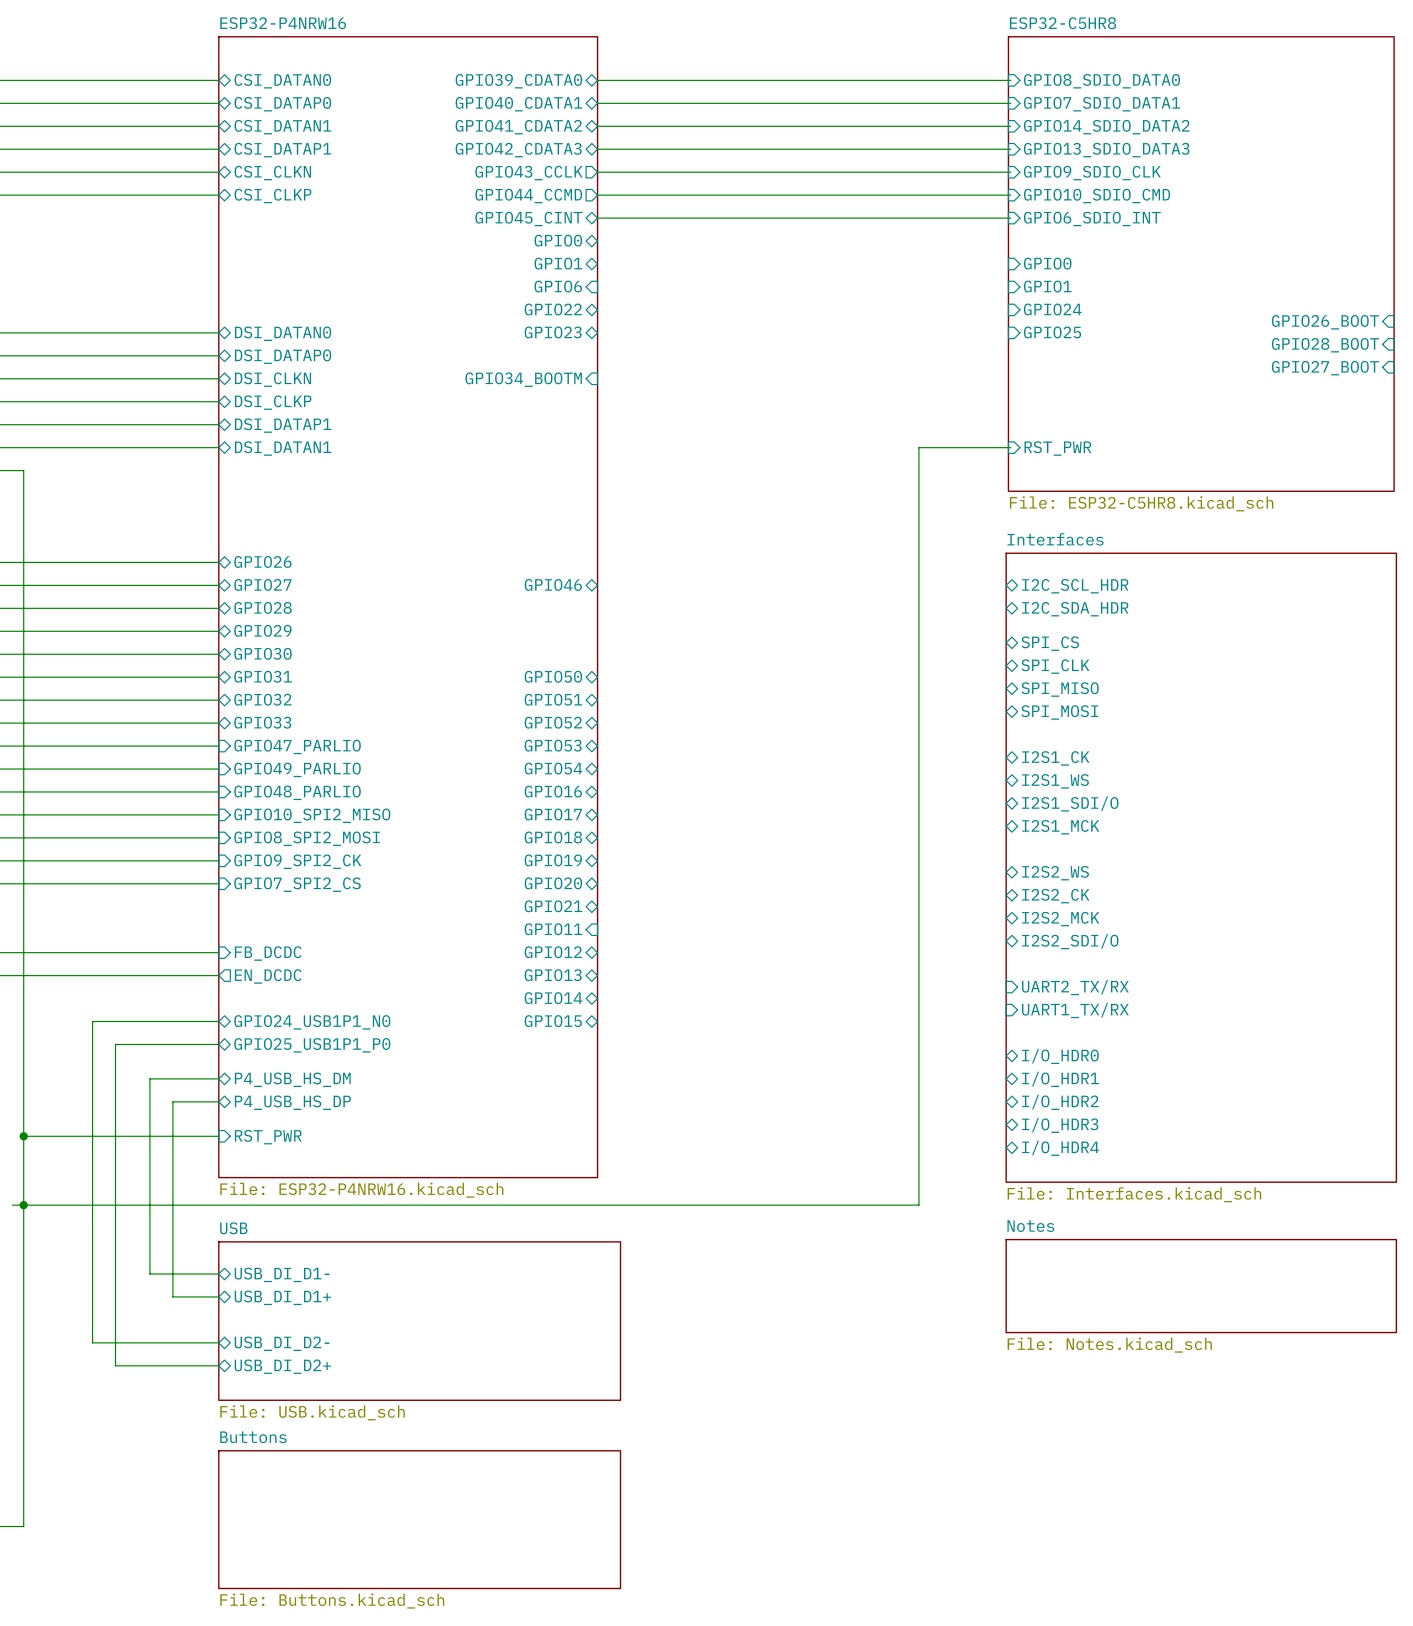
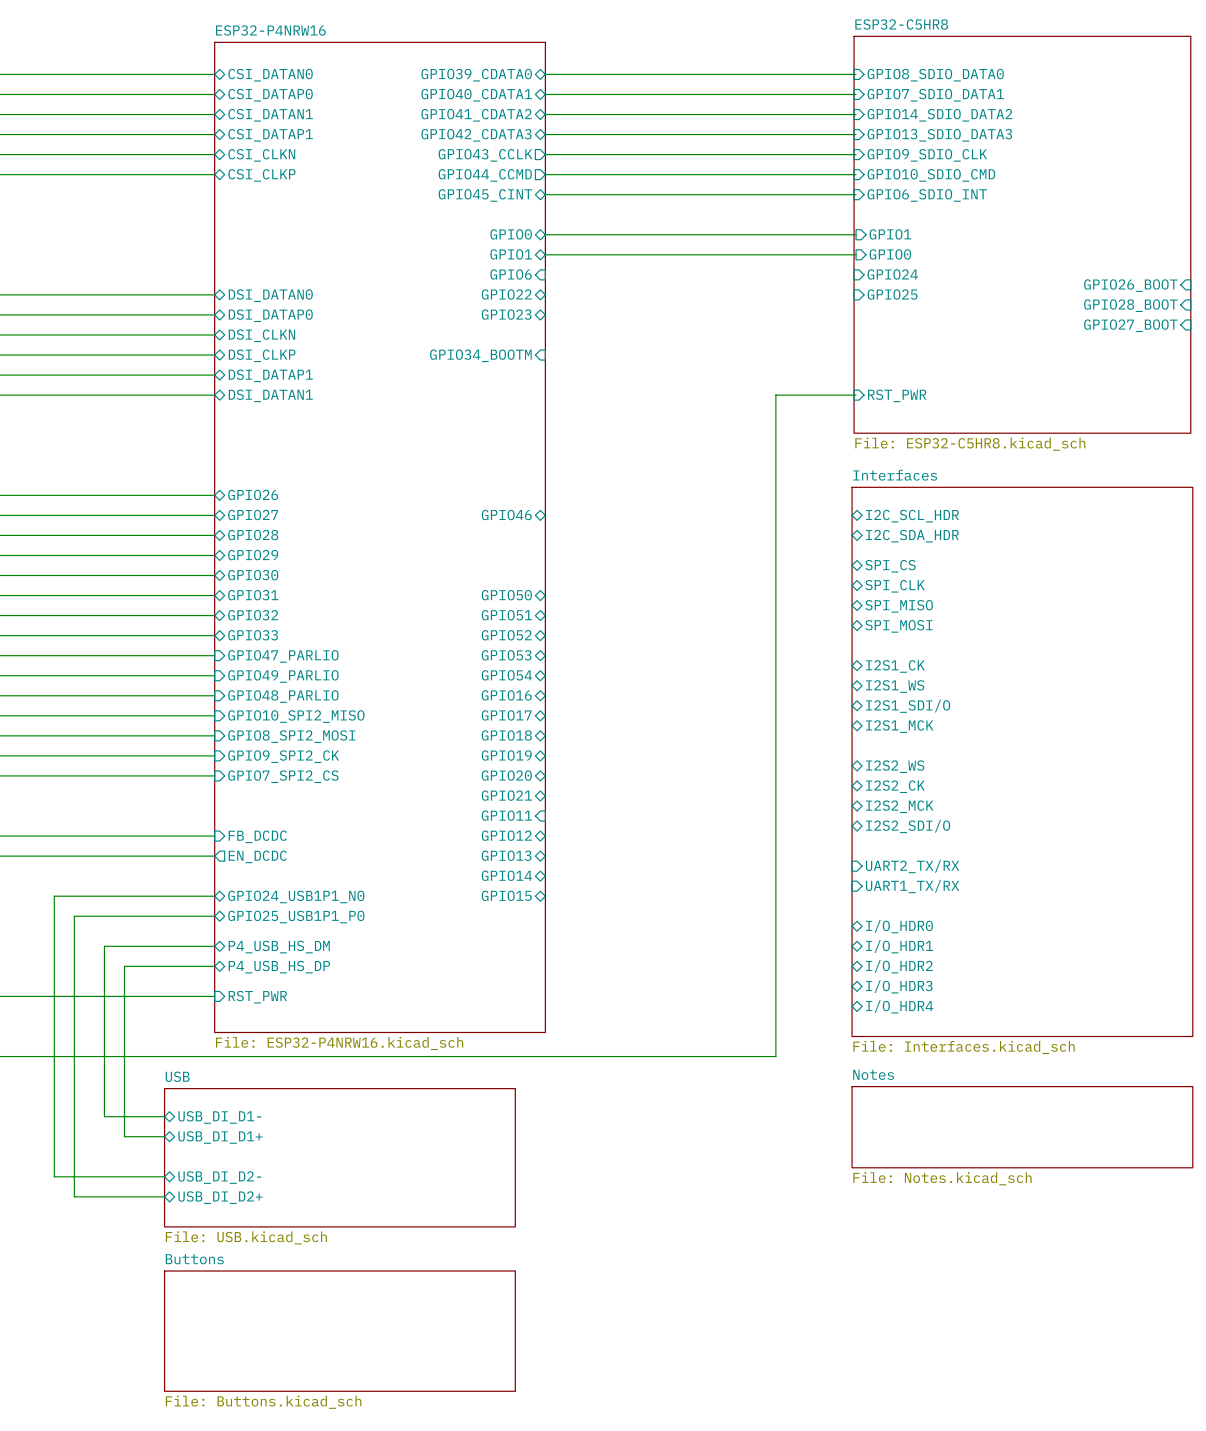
sheet ESP32-P4NRW16 shape: [218, 36, 599, 1179] -> [214, 41, 546, 1034]
wire: none -> (164, 74) (214, 74)
wire: (597, 80) (654, 80) -> none
sheet pin position: CSI_DATAN0 (282, 81) -> CSI_DATAN0 (270, 75)
sheet pin position: GPIO39_CDATA0 (518, 81) -> GPIO39_CDATA0 (476, 75)
wire: none -> (164, 94) (214, 94)
wire: (597, 103) (654, 103) -> none
sheet pin position: CSI_DATAP0 (282, 104) -> CSI_DATAP0 (270, 95)
sheet pin position: GPIO40_CDATA1 (518, 104) -> GPIO40_CDATA1 (476, 95)
wire: none -> (164, 114) (214, 114)
wire: (597, 126) (654, 126) -> none
sheet pin position: CSI_DATAN1 (282, 127) -> CSI_DATAN1 (270, 115)
sheet pin position: GPIO41_CDATA2 (518, 127) -> GPIO41_CDATA2 (476, 115)
wire: none -> (164, 134) (214, 134)
wire: (597, 149) (654, 149) -> none
sheet pin position: CSI_DATAP1 (282, 150) -> CSI_DATAP1 (270, 135)
sheet pin position: GPIO42_CDATA3 (518, 150) -> GPIO42_CDATA3 (476, 135)
wire: none -> (164, 154) (214, 154)
wire: (597, 172) (654, 172) -> none
sheet pin position: CSI_CLKN (272, 173) -> CSI_CLKN (261, 155)
sheet pin position: GPIO43_CCLK (529, 173) -> GPIO43_CCLK (485, 155)
wire: none -> (164, 174) (214, 174)
wire: (597, 195) (654, 195) -> none
sheet pin position: CSI_CLKP (272, 196) -> CSI_CLKP (261, 175)
sheet pin position: GPIO44_CCMD (528, 196) -> GPIO44_CCMD (485, 175)
sheet pin position: GPIO45_CINT (528, 218) -> GPIO45_CINT (485, 195)
wire: (597, 218) (654, 218) -> none
sheet pin position: GPIO0 (558, 240) -> GPIO0 (511, 234)
sheet pin position: GPIO1 (558, 263) -> GPIO1 (511, 254)
sheet pin position: GPIO0 (1047, 263) -> GPIO0 (890, 254)
wire: none -> (545, 234) (856, 234)
sheet pin position: GPIO6 (558, 286) -> GPIO6 (511, 274)
wire: none -> (545, 254) (856, 254)
sheet pin position: GPIO1 (1047, 286) -> GPIO1 (890, 234)
sheet pin position: GPIO22 (553, 309) -> GPIO22 (506, 294)
wire: none -> (164, 294) (214, 294)
sheet pin position: GPIO23 (553, 332) -> GPIO23 (506, 314)
sheet pin position: DSI_DATAN0 (283, 333) -> DSI_DATAN0 (270, 295)
wire: none -> (164, 314) (214, 314)
sheet pin position: DSI_DATAP0 (283, 356) -> DSI_DATAP0 (270, 315)
wire: none -> (164, 334) (214, 334)
sheet pin position: DSI_CLKN (272, 379) -> DSI_CLKN (261, 335)
sheet pin position: GPIO34_BOOTM (523, 379) -> GPIO34_BOOTM (480, 355)
wire: none -> (164, 355) (214, 355)
sheet pin position: DSI_CLKP (273, 402) -> DSI_CLKP (262, 355)
wire: none -> (164, 375) (214, 375)
sheet pin position: DSI_DATAP1 (283, 425) -> DSI_DATAP1 (270, 375)
wire: none -> (164, 395) (214, 395)
sheet pin position: DSI_DATAN1 (283, 448) -> DSI_DATAN1 (270, 395)
wire: none -> (164, 495) (214, 495)
sheet pin position: GPIO26 (262, 562) -> GPIO26 (253, 494)
sheet pin position: GPIO27 (262, 584) -> GPIO27 (253, 515)
sheet pin position: GPIO46 (553, 584) -> GPIO46 (506, 515)
wire: none -> (164, 515) (214, 515)
sheet pin position: GPIO28 (263, 607) -> GPIO28 (253, 535)
wire: none -> (164, 535) (214, 535)
sheet pin position: GPIO29 (262, 630) -> GPIO29 (253, 555)
wire: none -> (164, 555) (214, 555)
sheet pin position: GPIO30 (262, 653) -> GPIO30 (253, 575)
wire: none -> (164, 575) (214, 575)
sheet pin position: GPIO31 (263, 676) -> GPIO31 (253, 595)
sheet pin position: GPIO50 (553, 676) -> GPIO50 (506, 595)
wire: none -> (164, 595) (214, 595)
sheet pin position: GPIO32 (262, 699) -> GPIO32 (253, 615)
sheet pin position: GPIO51 (553, 699) -> GPIO51 (506, 615)
wire: none -> (164, 615) (214, 615)
sheet pin position: GPIO33 (262, 722) -> GPIO33 (253, 635)
sheet pin position: GPIO52 (553, 722) -> GPIO52 (506, 635)
wire: none -> (164, 635) (214, 635)
sheet pin position: GPIO53 (553, 745) -> GPIO53 (506, 655)
wire: none -> (164, 655) (214, 655)
sheet pin position: GPIO47_PARLIO (297, 746) -> GPIO47_PARLIO (283, 656)
sheet pin position: GPIO54 (553, 768) -> GPIO54 (506, 675)
wire: none -> (164, 675) (214, 675)
sheet pin position: GPIO49_PARLIO (297, 769) -> GPIO49_PARLIO (283, 676)
wire: none -> (164, 695) (214, 695)
sheet pin position: GPIO16 (553, 791) -> GPIO16 (506, 695)
sheet pin position: GPIO48_PARLIO (297, 792) -> GPIO48_PARLIO (283, 696)
wire: none -> (164, 715) (214, 715)
sheet pin position: GPIO17 (553, 814) -> GPIO17 (506, 715)
sheet pin position: GPIO10_SPI2_MISO (312, 815) -> GPIO10_SPI2_MISO (296, 716)
wire: none -> (164, 735) (214, 735)
sheet pin position: GPIO18 (553, 837) -> GPIO18 (506, 735)
sheet pin position: GPIO8_SPI2_MOSI (307, 838) -> GPIO8_SPI2_MOSI (291, 736)
wire: none -> (164, 755) (214, 755)
sheet pin position: GPIO19 (553, 860) -> GPIO19 (506, 755)
sheet pin position: GPIO9_SPI2_CK (297, 861) -> GPIO9_SPI2_CK (283, 756)
wire: none -> (164, 775) (214, 775)
sheet pin position: GPIO20 (553, 883) -> GPIO20 (506, 775)
sheet pin position: GPIO7_SPI2_CS (297, 884) -> GPIO7_SPI2_CS (283, 776)
sheet pin position: GPIO21 (553, 906) -> GPIO21 (506, 795)
sheet pin position: GPIO11 (553, 929) -> GPIO11 (506, 815)
wire: none -> (164, 836) (214, 836)
sheet pin position: GPIO12 (553, 952) -> GPIO12 (506, 835)
sheet pin position: FB_DCDC (268, 953) -> FB_DCDC (257, 836)
wire: none -> (164, 856) (214, 856)
sheet pin position: GPIO13 (553, 975) -> GPIO13 (506, 855)
sheet pin position: EN_DCDC (268, 976) -> EN_DCDC (257, 856)
sheet pin position: GPIO14 (553, 998) -> GPIO14 (506, 875)
wire: none -> (164, 896) (214, 896)
sheet pin position: GPIO15 (553, 1021) -> GPIO15 (506, 895)
sheet pin position: GPIO24_USB1P1_N0 (312, 1022) -> GPIO24_USB1P1_N0 (296, 896)
wire: none -> (164, 916) (214, 916)
sheet pin position: GPIO25_USB1P1_P0 (312, 1045) -> GPIO25_USB1P1_P0 (296, 916)
wire: none -> (164, 946) (214, 946)
sheet pin position: P4_USB_HS_DM (292, 1079) -> P4_USB_HS_DM (279, 947)
wire: none -> (164, 966) (214, 966)
sheet pin position: P4_USB_HS_DP (292, 1102) -> P4_USB_HS_DP (279, 967)
wire: none -> (164, 996) (214, 996)
sheet pin position: RST_PWR (268, 1137) -> RST_PWR (257, 997)

